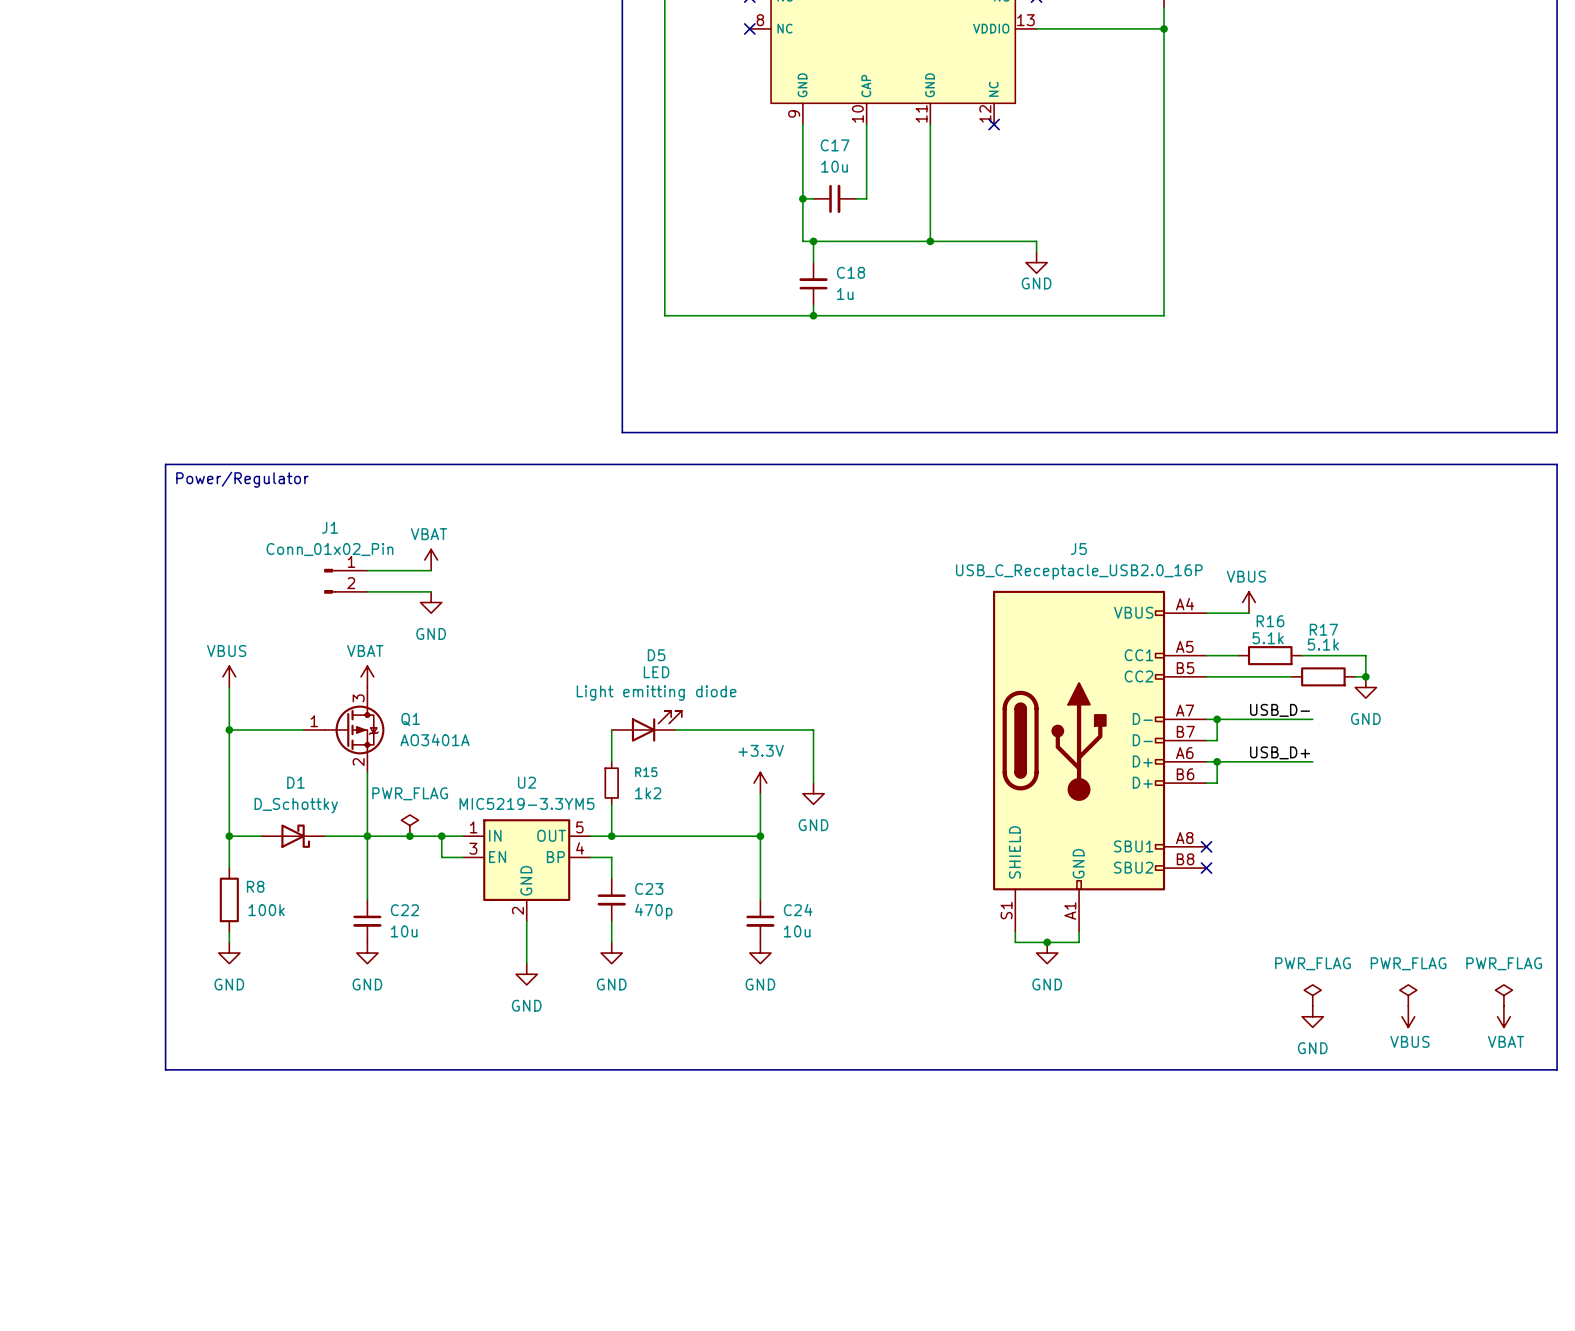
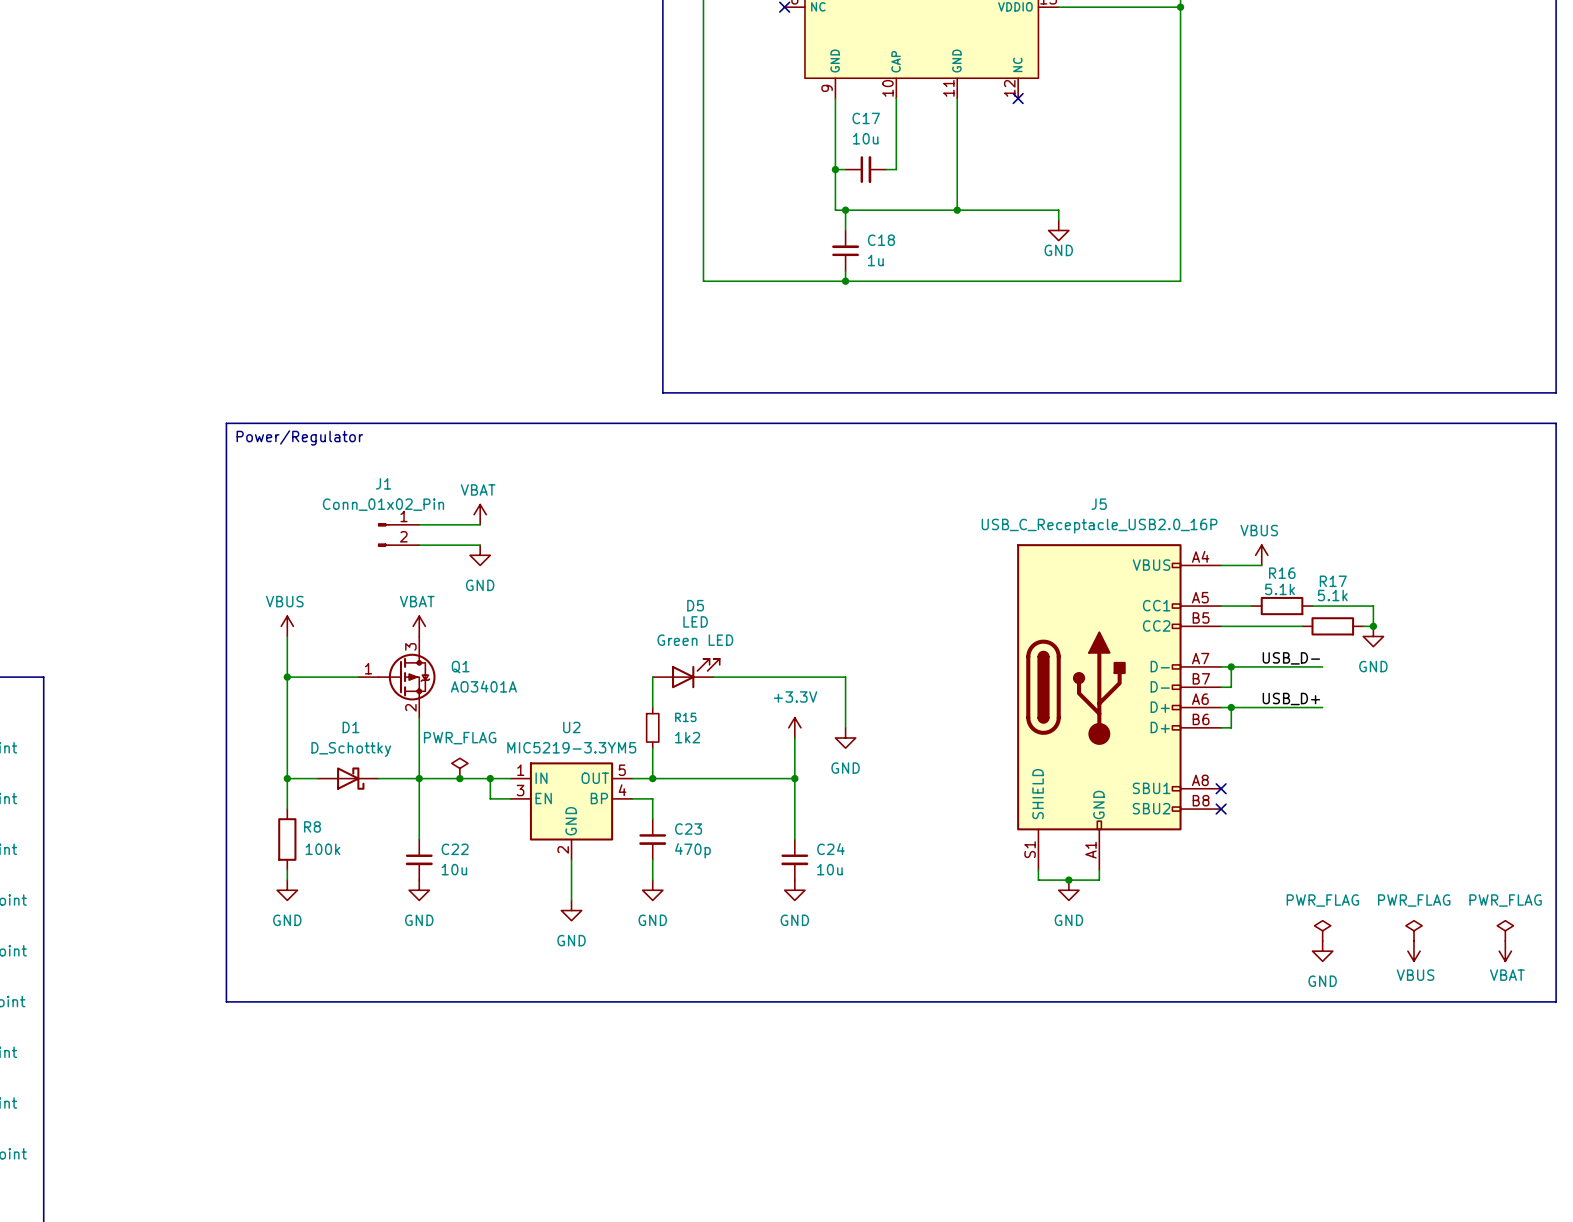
D5 text: Light emitting diode (656, 693) -> Green LED (695, 640)

